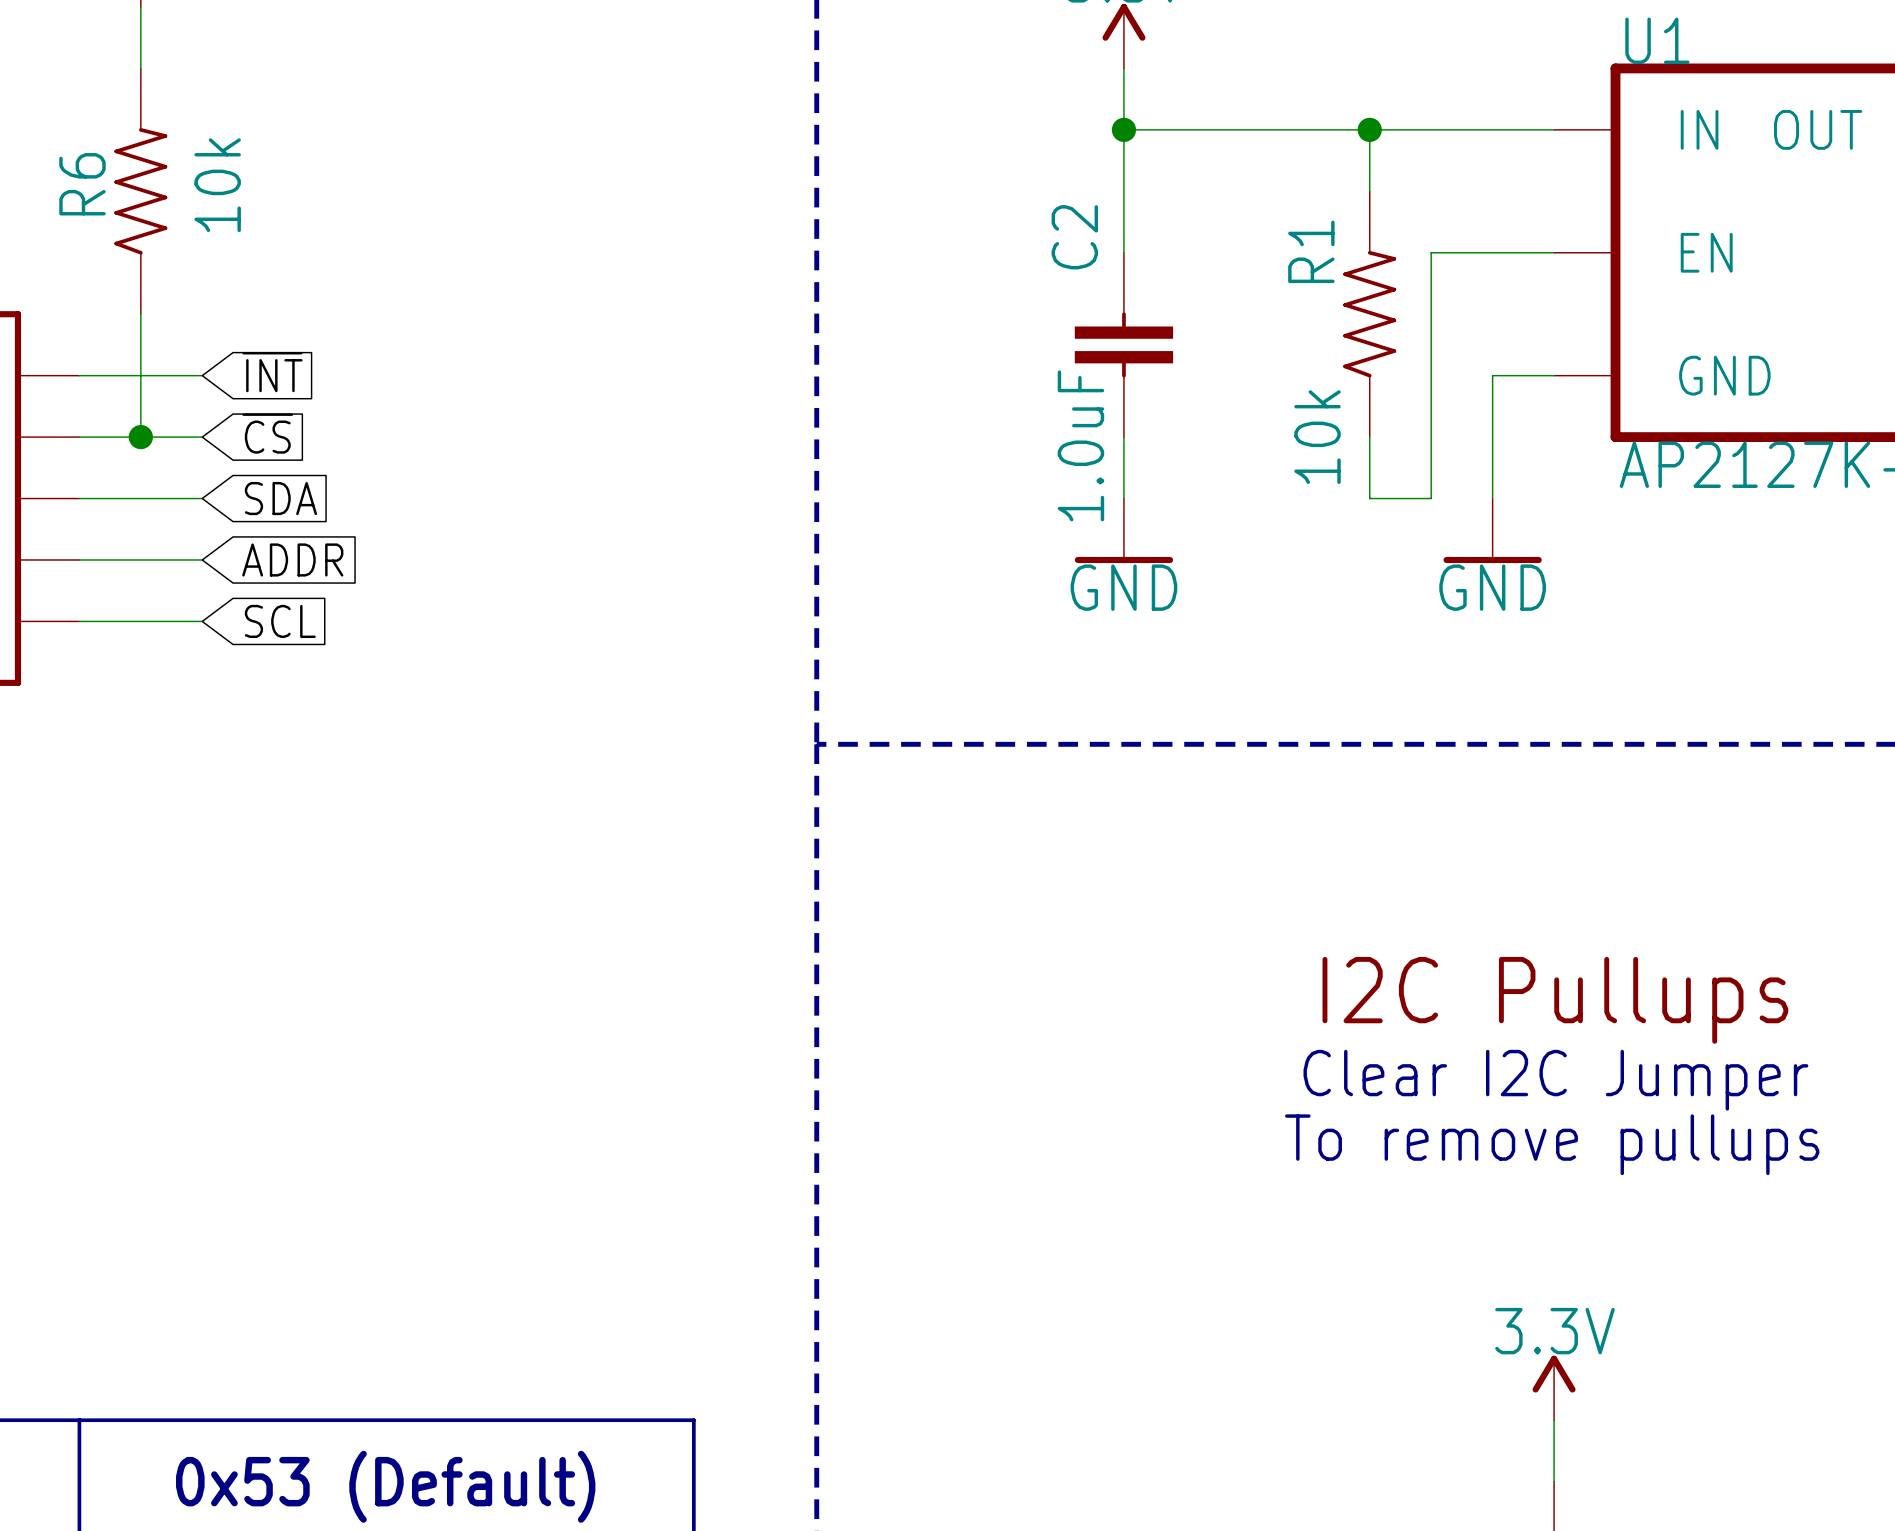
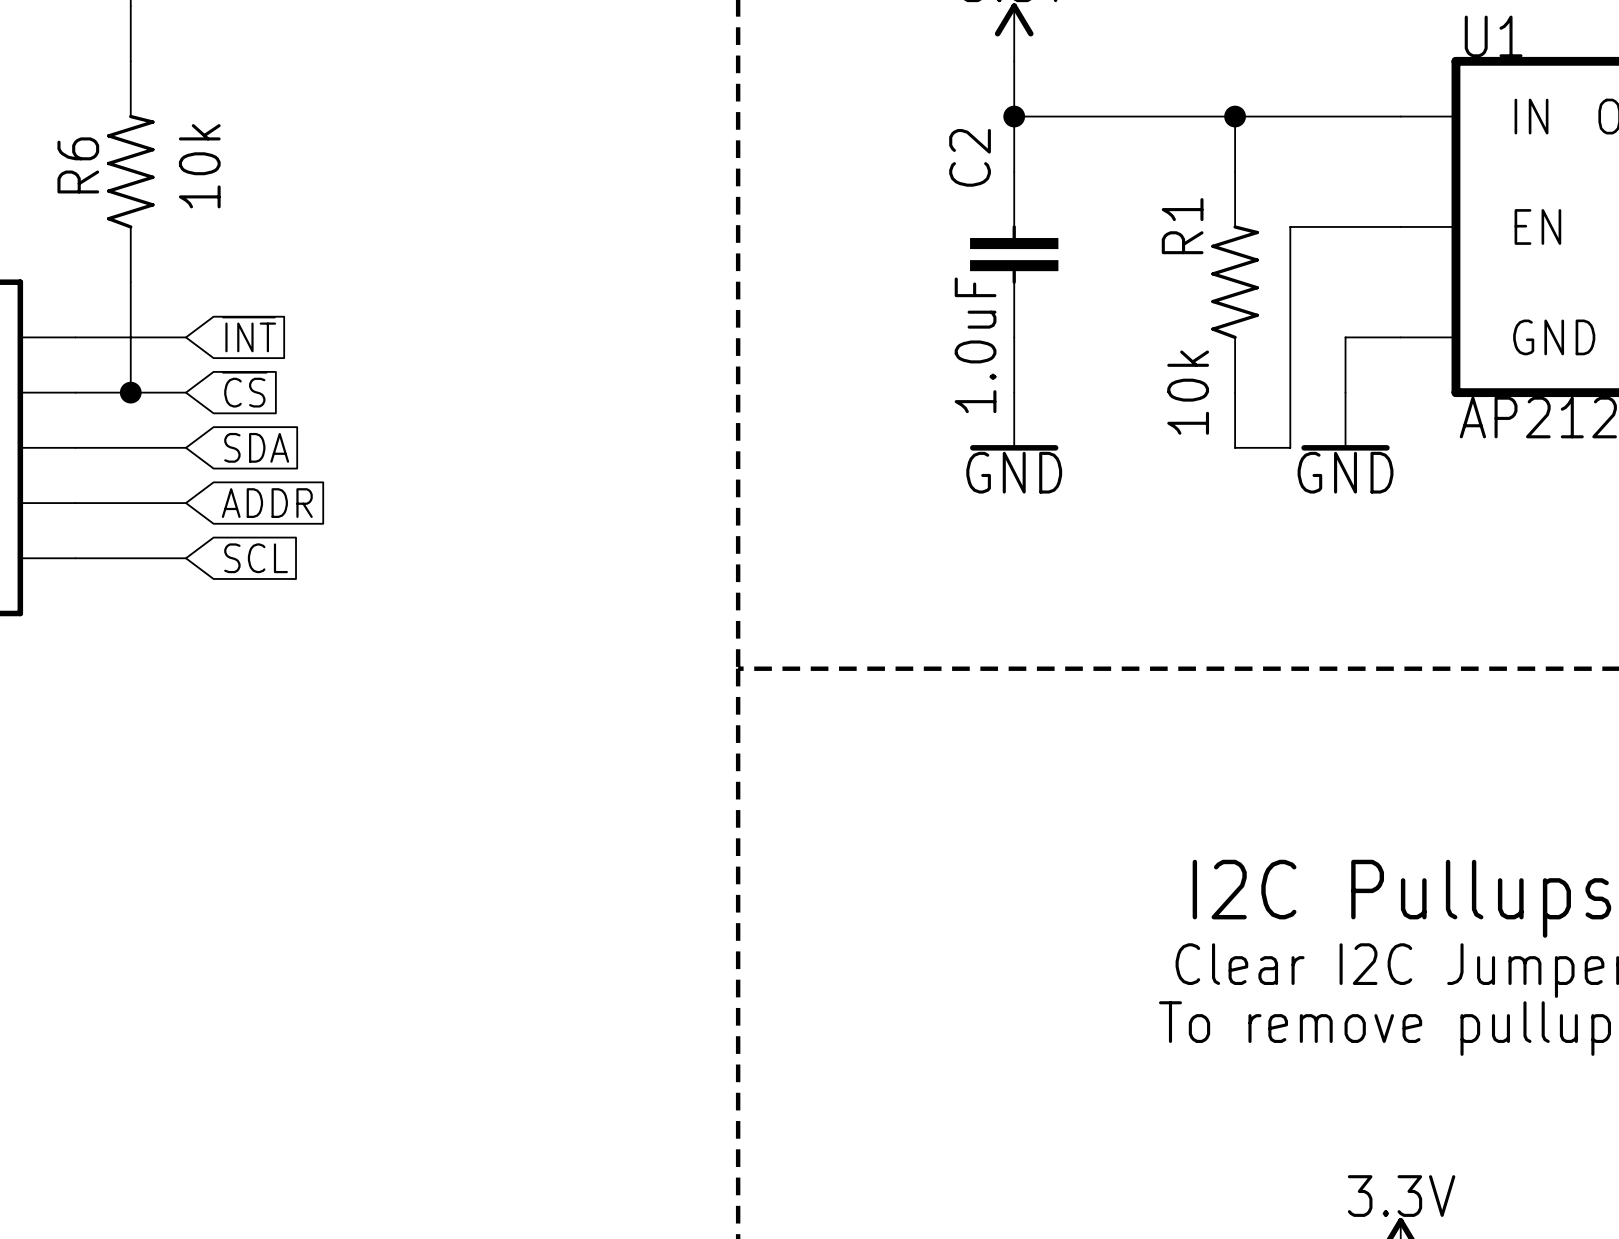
C2 position: (1123, 344) -> (1014, 254)
power symbol position: GND (1123, 530) -> GND (1014, 421)
power symbol position: GND (1492, 530) -> GND (1345, 421)

